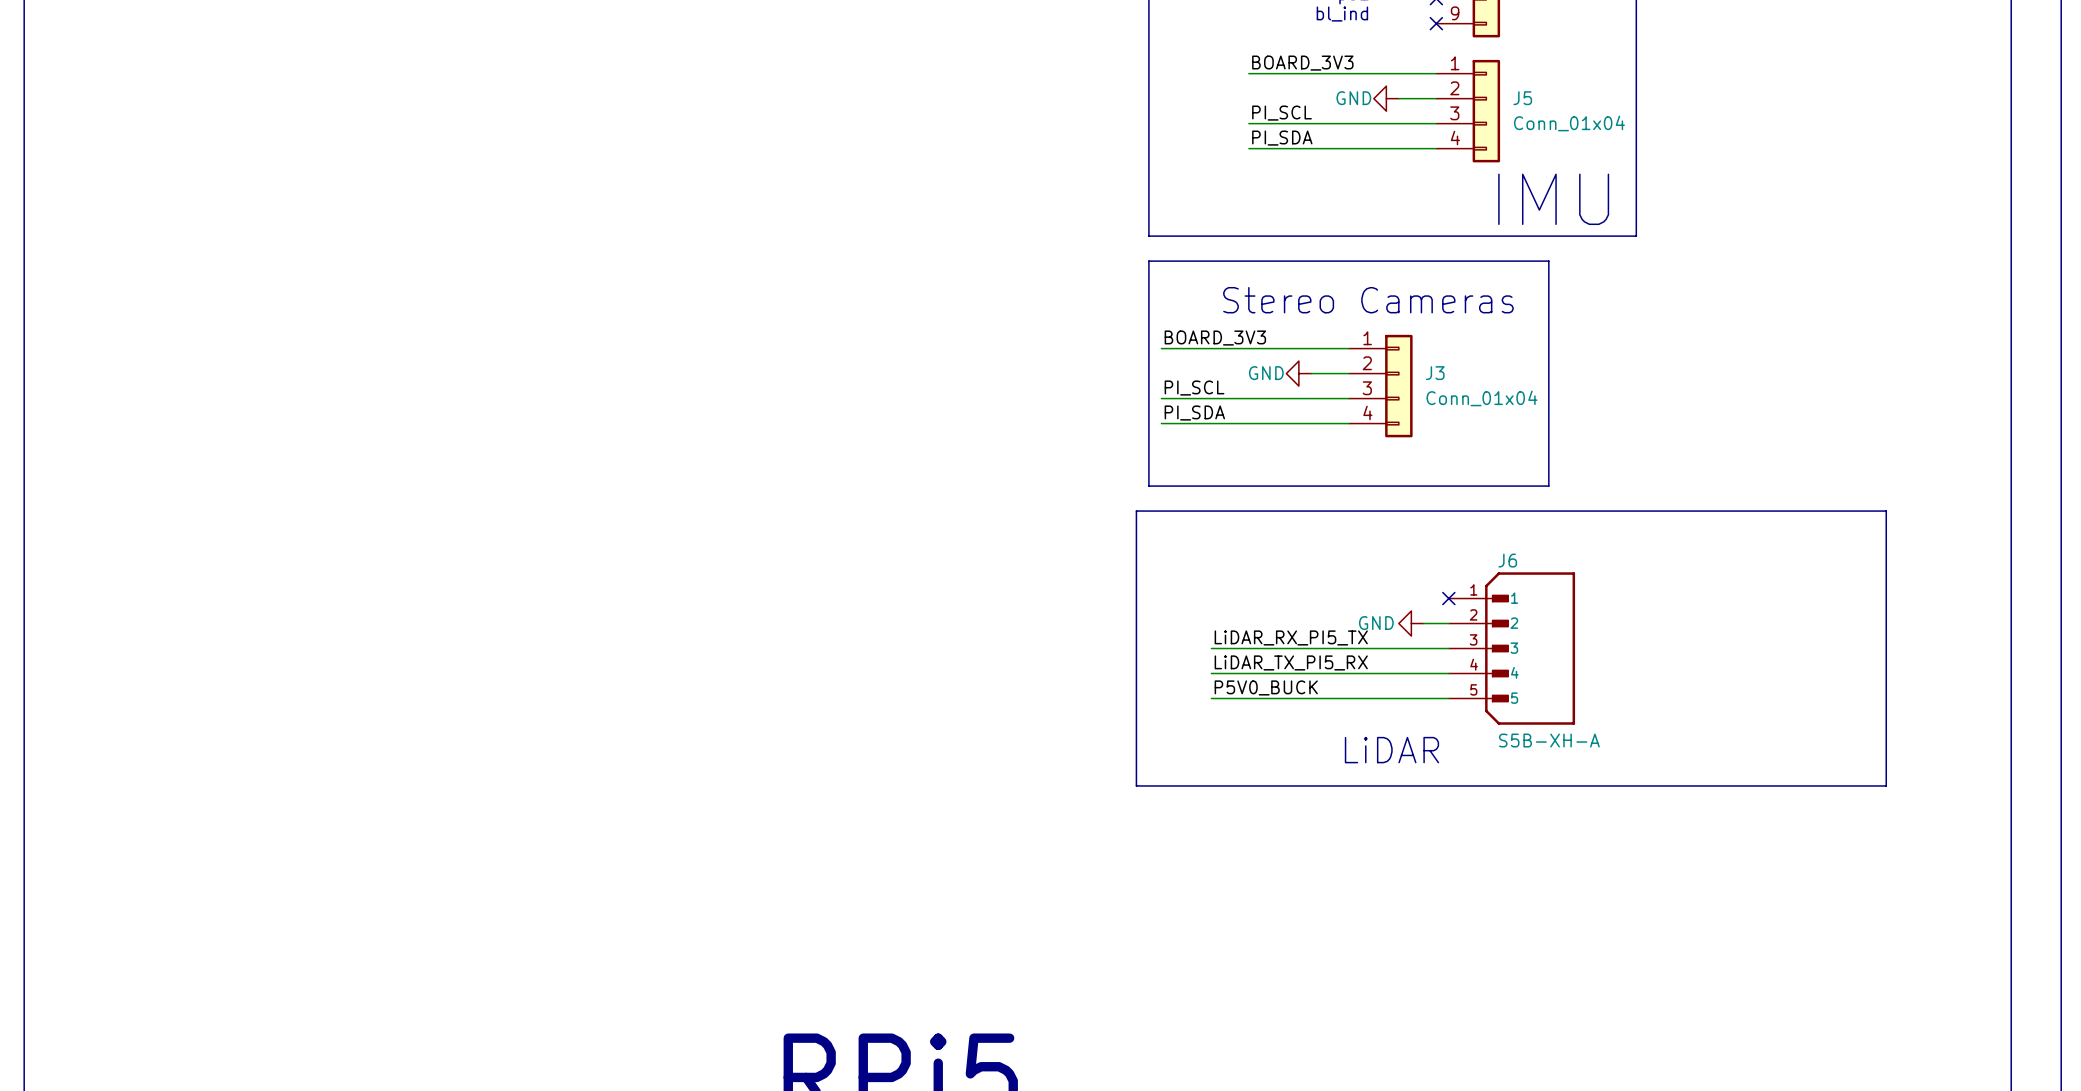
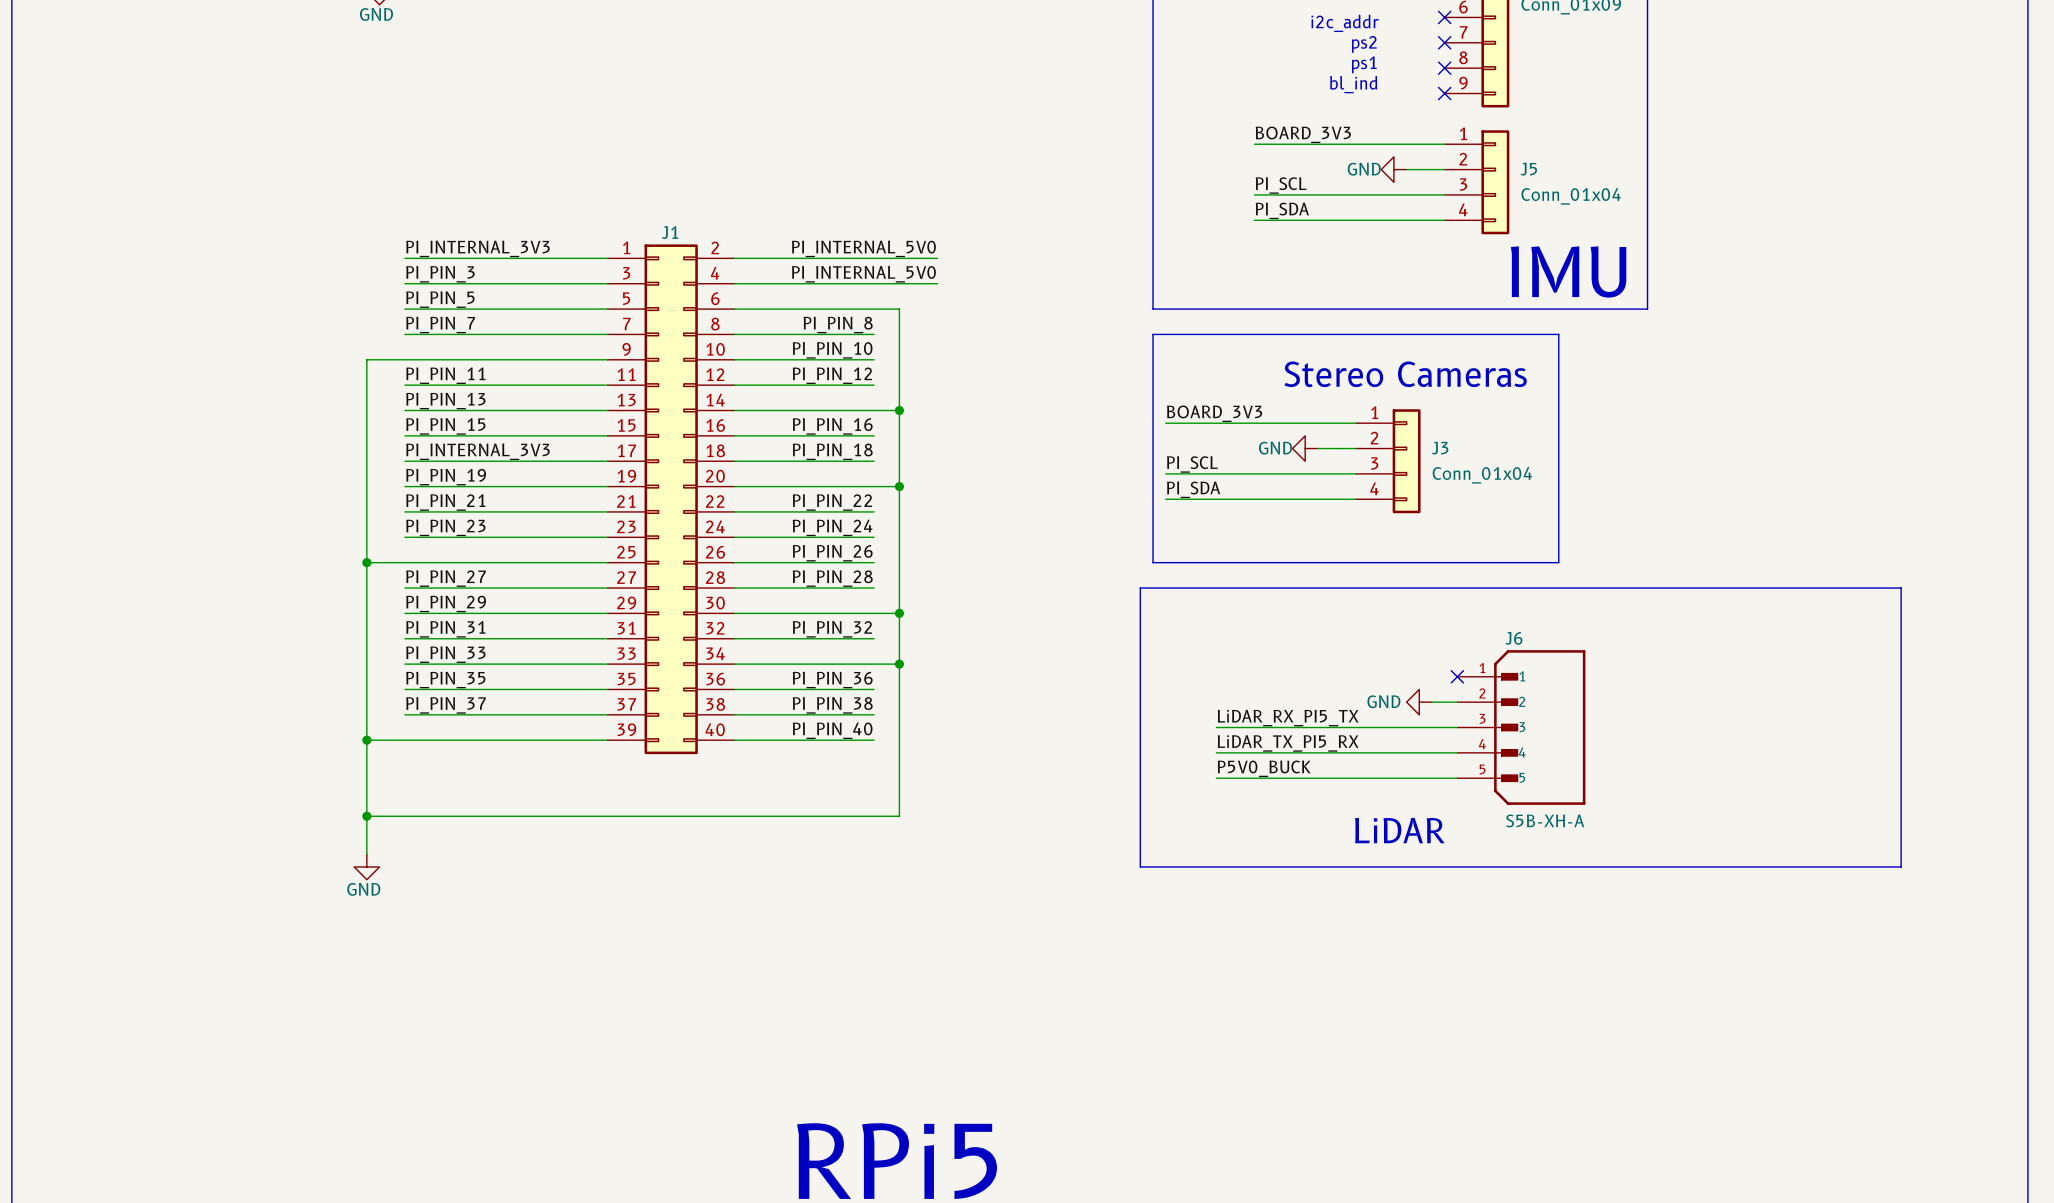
label: none -> PI_INTERNAL_3V3 (477, 248)
label: none -> PI_INTERNAL_5V0 (863, 248)
wire: none -> (404, 258) (607, 258)
wire: none -> (734, 258) (937, 258)
label: none -> PI_PIN_3 (440, 274)
label: none -> PI_INTERNAL_5V0 (863, 274)
wire: none -> (404, 283) (607, 283)
wire: none -> (734, 283) (937, 283)
label: none -> PI_PIN_5 (440, 299)
wire: none -> (404, 309) (607, 309)
wire: none -> (734, 309) (899, 309) (899, 816) (366, 816)
label: none -> PI_PIN_7 (440, 325)
label: none -> PI_PIN_8 (838, 325)
wire: none -> (404, 334) (607, 334)
wire: none -> (734, 334) (874, 334)
label: none -> PI_PIN_10 (832, 350)
wire: none -> (607, 359) (366, 359) (366, 854)
wire: none -> (734, 359) (874, 359)
label: none -> PI_PIN_11 (445, 375)
label: none -> PI_PIN_12 (832, 375)
wire: none -> (404, 385) (607, 385)
wire: none -> (734, 385) (874, 385)
label: none -> PI_PIN_13 (445, 401)
wire: none -> (404, 410) (607, 410)
wire: none -> (734, 410) (899, 410)
junction: none -> (899, 410)
label: none -> PI_PIN_15 (445, 426)
label: none -> PI_PIN_16 (832, 426)
wire: none -> (404, 435) (607, 435)
wire: none -> (734, 435) (874, 435)
label: none -> PI_INTERNAL_3V3 (477, 451)
label: none -> PI_PIN_18 (832, 451)
wire: none -> (404, 461) (607, 461)
wire: none -> (734, 461) (874, 461)
label: none -> PI_PIN_19 (446, 477)
wire: none -> (404, 486) (607, 486)
wire: none -> (734, 486) (899, 486)
junction: none -> (899, 486)
J1: none -> (671, 499)
label: none -> PI_PIN_21 (445, 502)
label: none -> PI_PIN_22 (832, 502)
wire: none -> (404, 511) (607, 511)
wire: none -> (734, 511) (874, 511)
label: none -> PI_PIN_23 (445, 527)
label: none -> PI_PIN_24 (832, 527)
wire: none -> (404, 537) (607, 537)
wire: none -> (734, 537) (874, 537)
label: none -> PI_PIN_26 (832, 553)
wire: none -> (366, 562) (607, 562)
junction: none -> (366, 562)
wire: none -> (734, 562) (874, 562)
label: none -> PI_PIN_27 (446, 578)
label: none -> PI_PIN_28 (832, 578)
wire: none -> (404, 588) (607, 588)
wire: none -> (734, 588) (874, 588)
label: none -> PI_PIN_29 (446, 603)
wire: none -> (404, 613) (607, 613)
wire: none -> (734, 613) (899, 613)
junction: none -> (899, 613)
label: none -> PI_PIN_31 (445, 629)
label: none -> PI_PIN_32 (832, 629)
wire: none -> (404, 638) (607, 638)
wire: none -> (734, 638) (874, 638)
label: none -> PI_PIN_33 (445, 654)
wire: none -> (404, 664) (607, 664)
wire: none -> (734, 664) (899, 664)
junction: none -> (899, 664)
label: none -> PI_PIN_35 (445, 680)
label: none -> PI_PIN_36 (832, 680)
wire: none -> (404, 689) (607, 689)
wire: none -> (734, 689) (874, 689)
label: none -> PI_PIN_37 (446, 705)
label: none -> PI_PIN_38 (832, 705)
wire: none -> (404, 714) (607, 714)
wire: none -> (734, 714) (874, 714)
label: none -> PI_PIN_40 (832, 730)
wire: none -> (366, 740) (607, 740)
junction: none -> (366, 740)
wire: none -> (734, 740) (874, 740)
junction: none -> (366, 816)
power symbol: none -> GND (366, 866)

